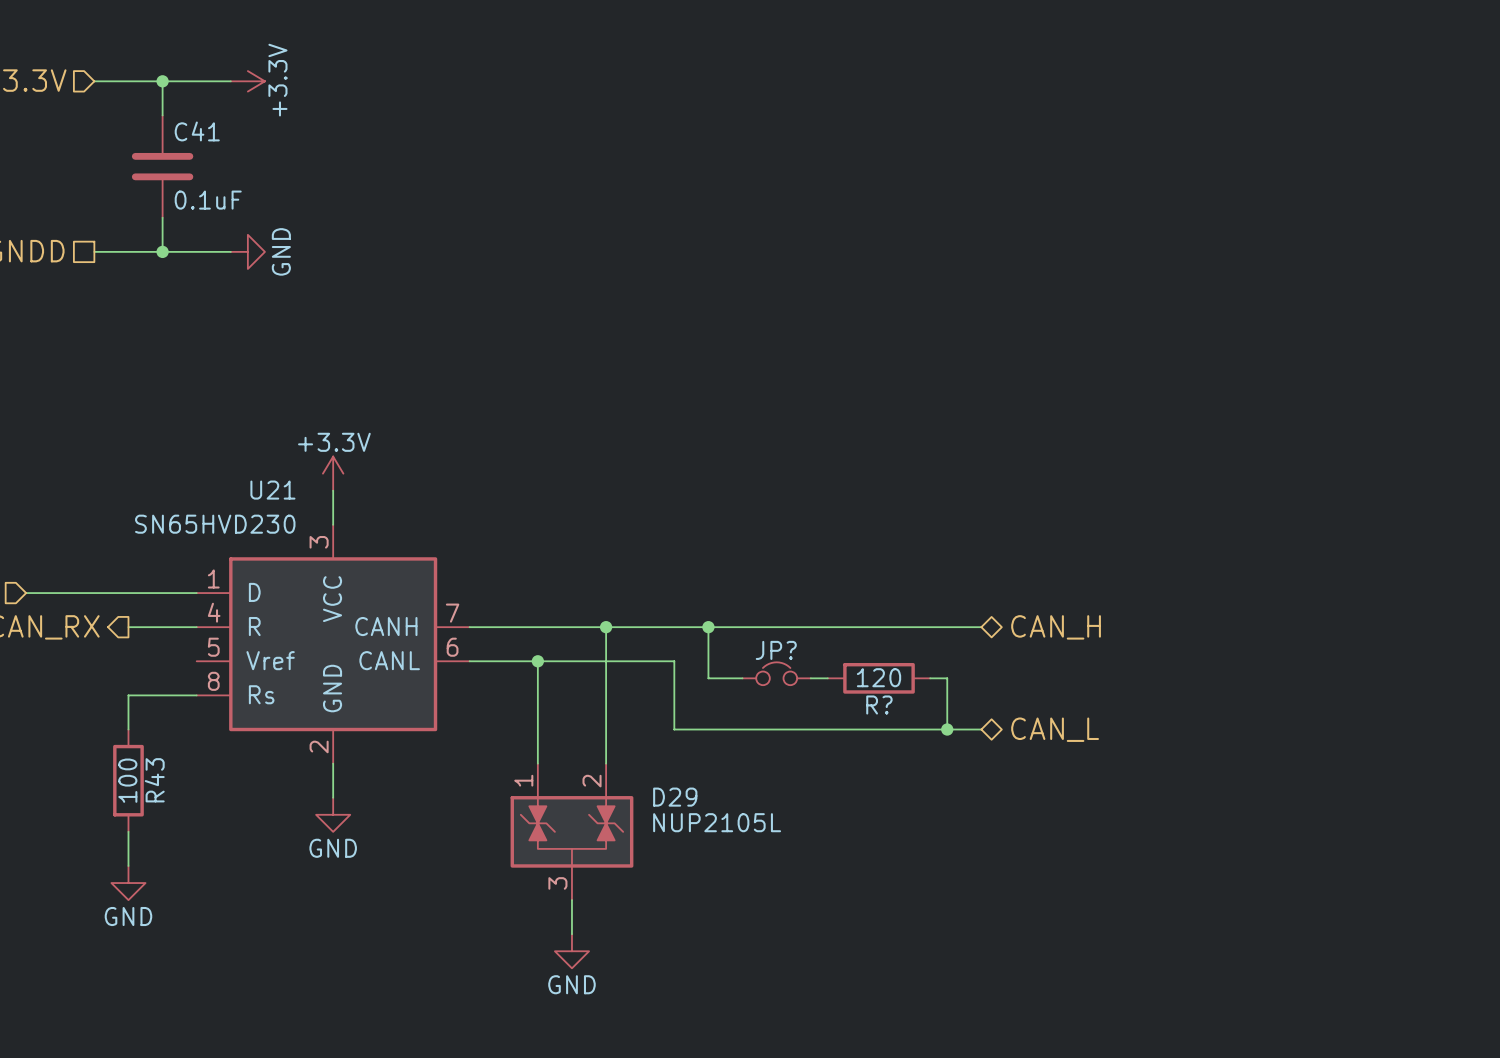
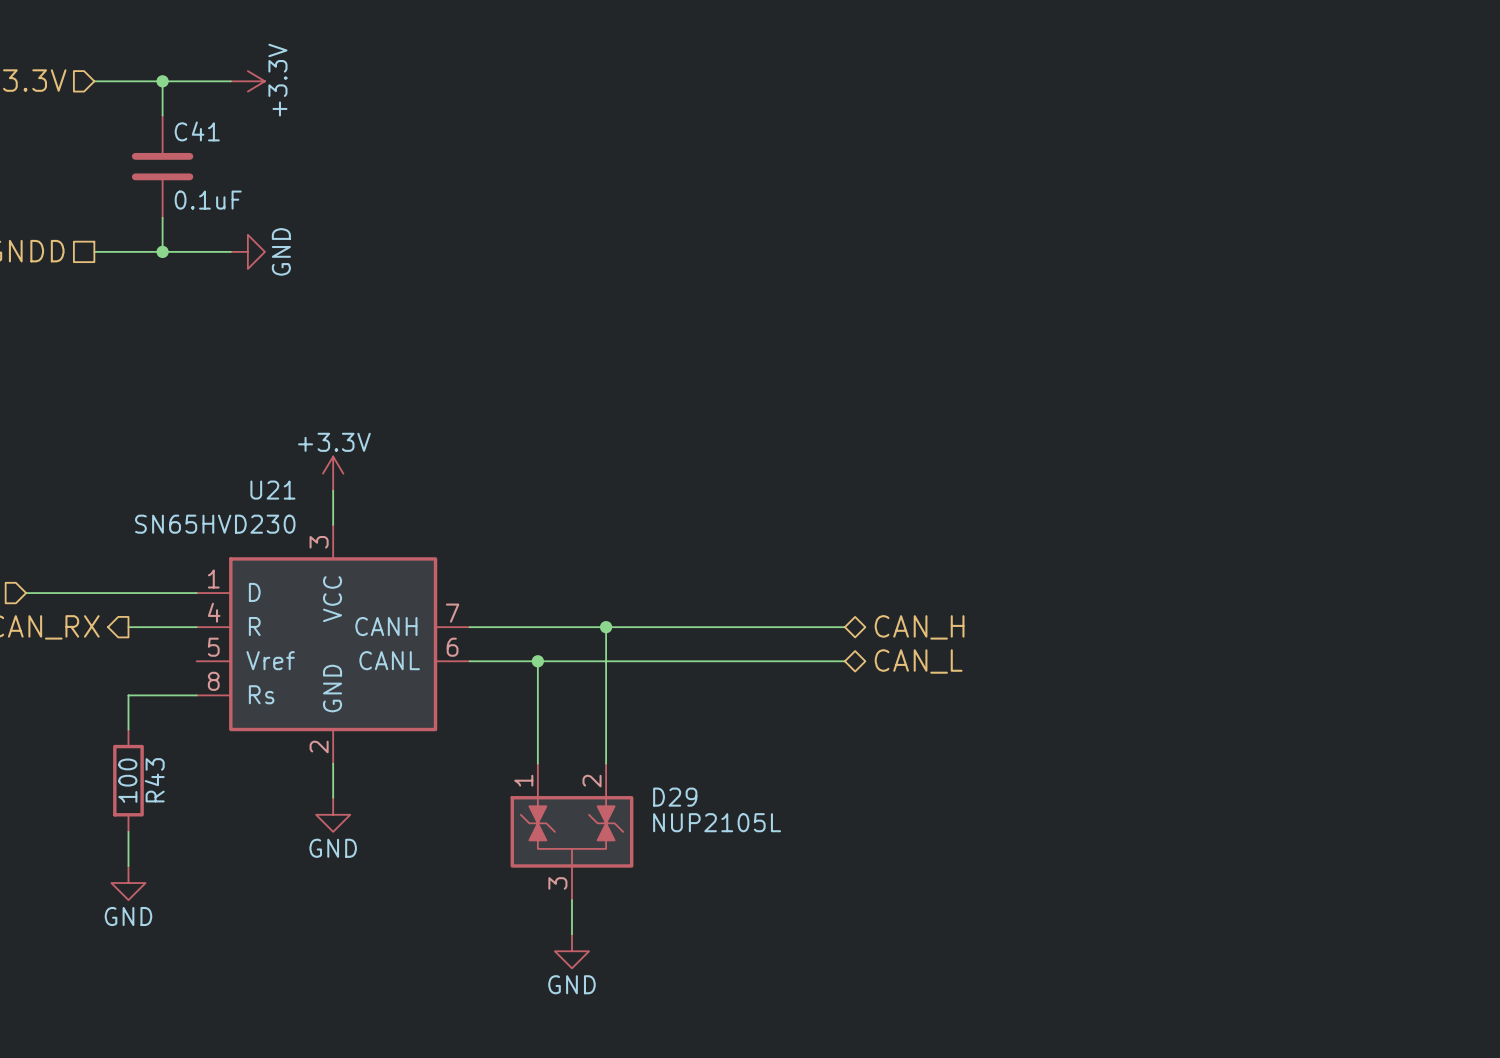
wire: (708, 627) (708, 678) (742, 678) -> none
junction: (708, 627) -> none
wire: (844, 627) (981, 627) -> none
hierarchical label position: CAN_H (1056, 627) -> CAN_H (919, 627)
wire: (674, 661) (674, 729) (981, 729) -> (674, 661) (844, 661)
JP?: (776, 673) -> none
wire: (810, 678) (827, 678) -> none
R?: 120 (879, 678) -> none
wire: (930, 678) (947, 678) (947, 729) -> none
junction: (947, 729) -> none
hierarchical label position: CAN_L (1055, 729) -> CAN_L (918, 661)

